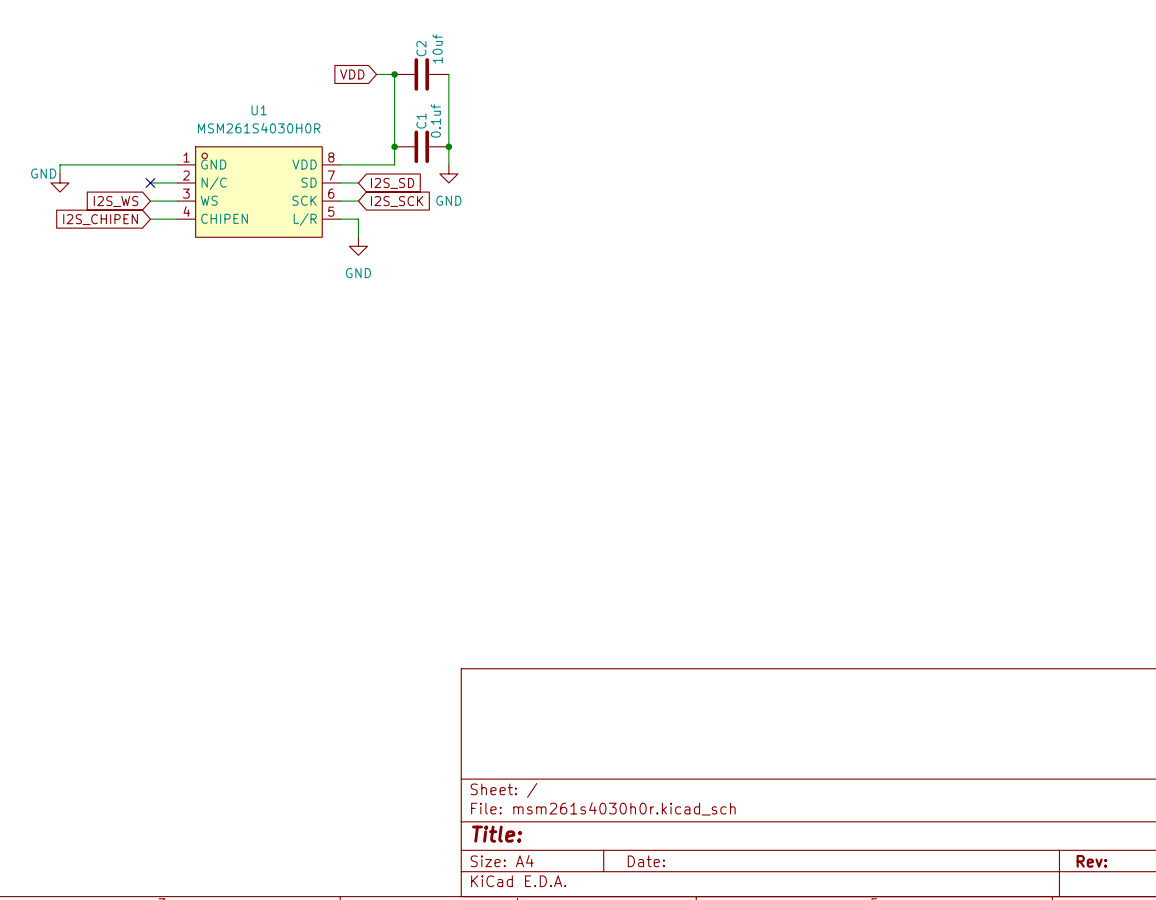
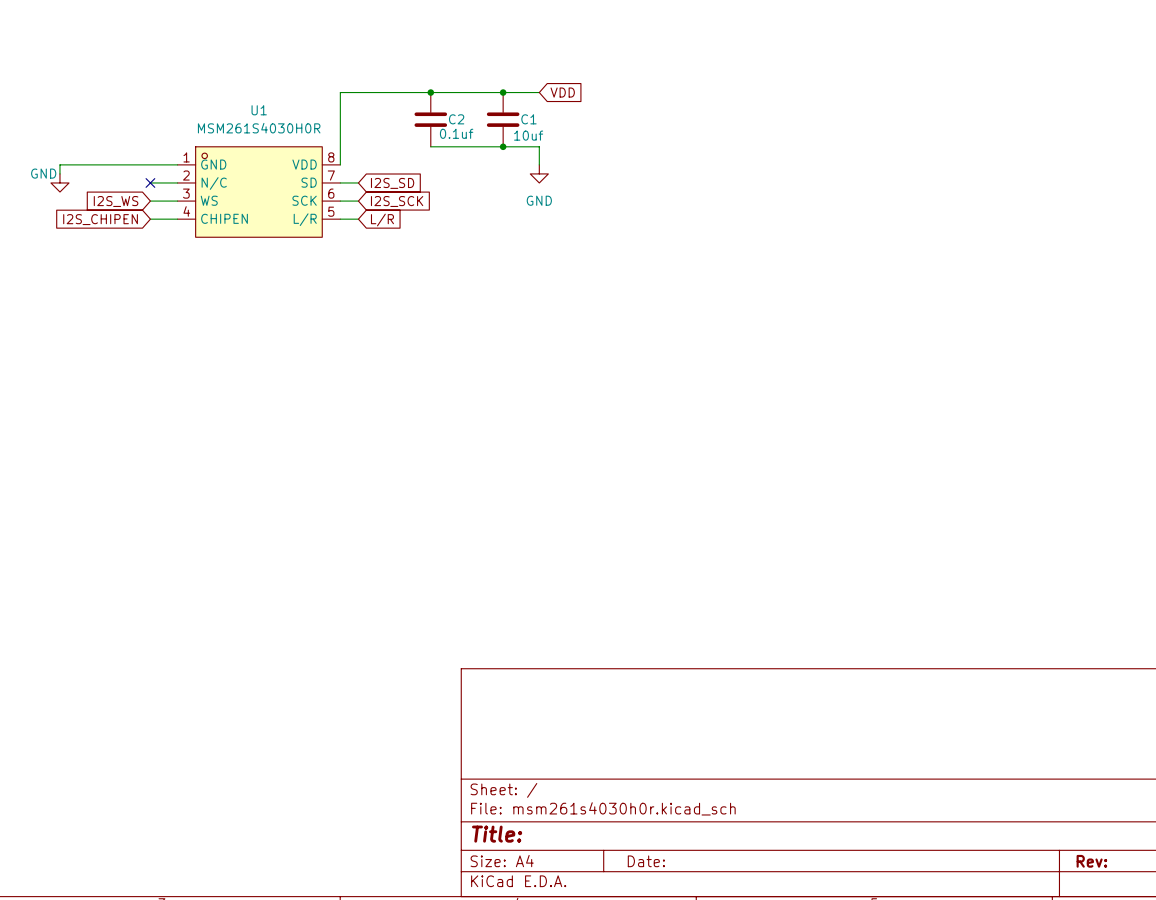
C2 value: 10uf (437, 48) -> 0.1uf (456, 133)
global label rotation: 0° (352, 74) -> 180° (562, 92)
global label position: VDD (352, 74) -> VDD (562, 92)
wire: (376, 74) (394, 74) (394, 164) (340, 164) -> (539, 92) (340, 92) (340, 164)
junction: (394, 74) -> none
C2 rotation: 0° (421, 74) -> 90° clockwise (430, 119)
C2 position: (421, 74) -> (430, 119)
wire: (448, 74) (448, 164) -> none
junction: none -> (430, 92)
junction: none -> (503, 92)
C1 value: 0.1uf (435, 120) -> 10uf (528, 135)
junction: (394, 146) -> none
C1 rotation: 0° (421, 146) -> 90° clockwise (503, 119)
C1 position: (421, 146) -> (503, 119)
wire: none -> (430, 146) (539, 146) (539, 164)
junction: (448, 146) -> none
junction: none -> (503, 146)
power symbol position: GND (448, 173) -> GND (539, 173)
wire: (358, 219) (358, 237) -> none
global label: none -> L/R (382, 220)
power symbol: GND (358, 246) -> none

